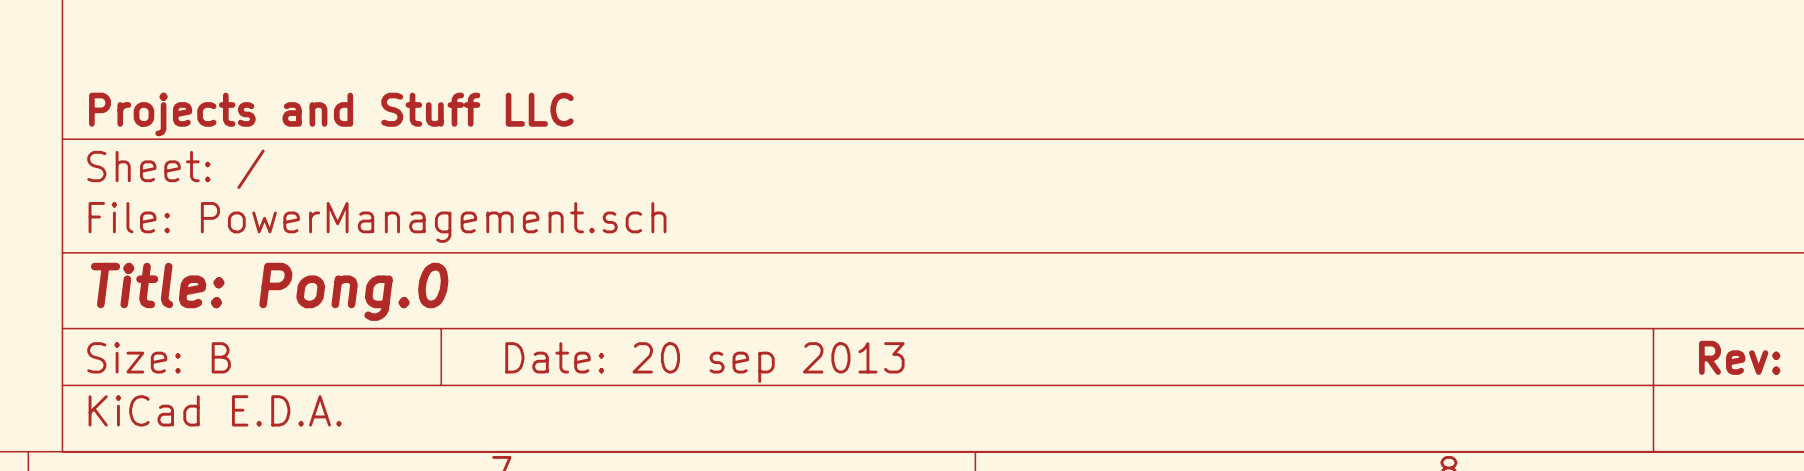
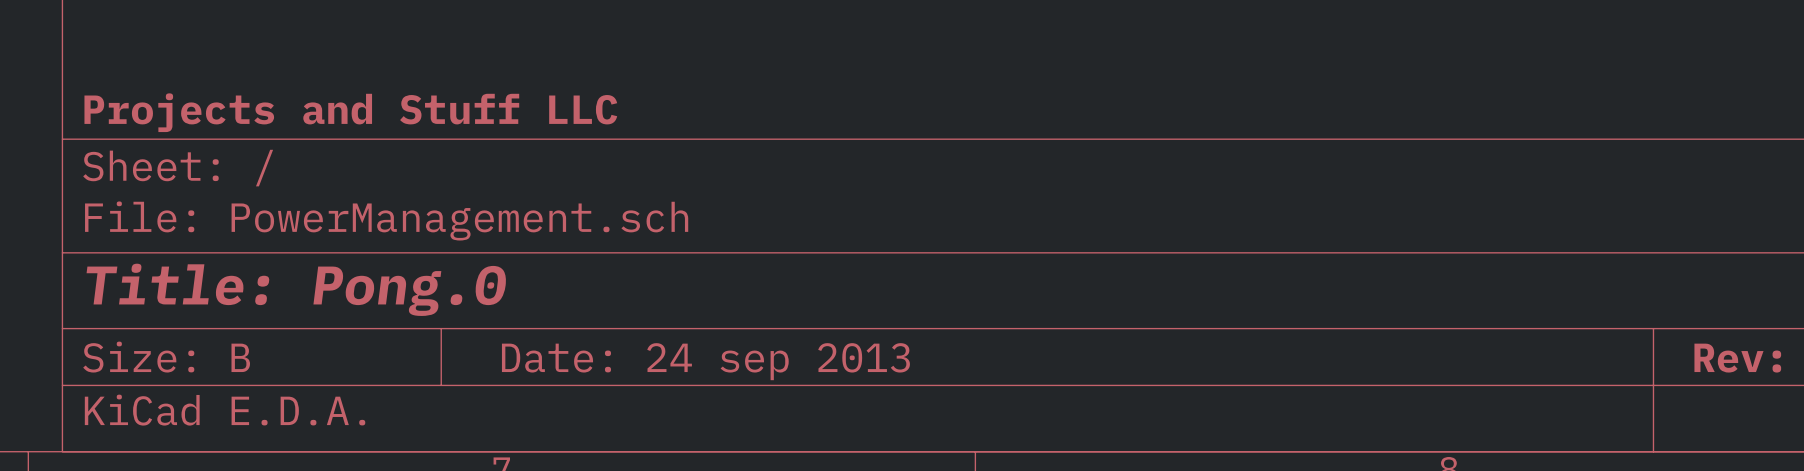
title block: Date: 20 sep 2013 (704, 362) -> Date: 24 sep 2013 (705, 361)

